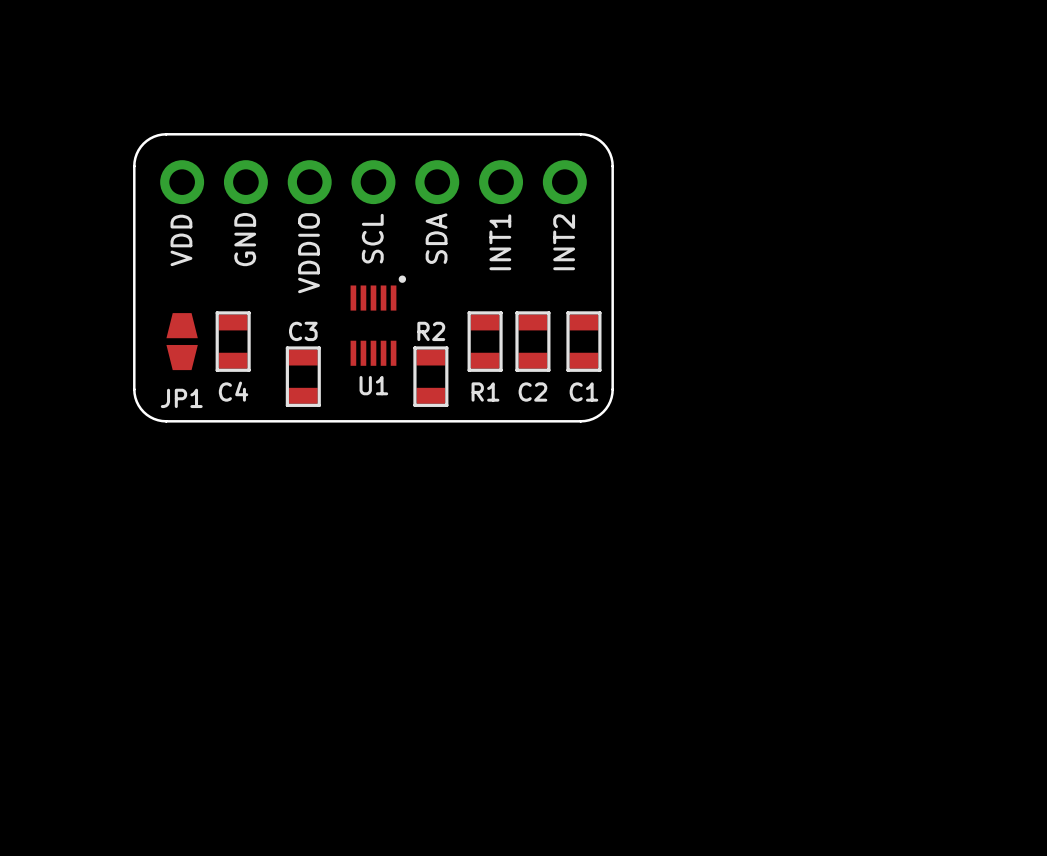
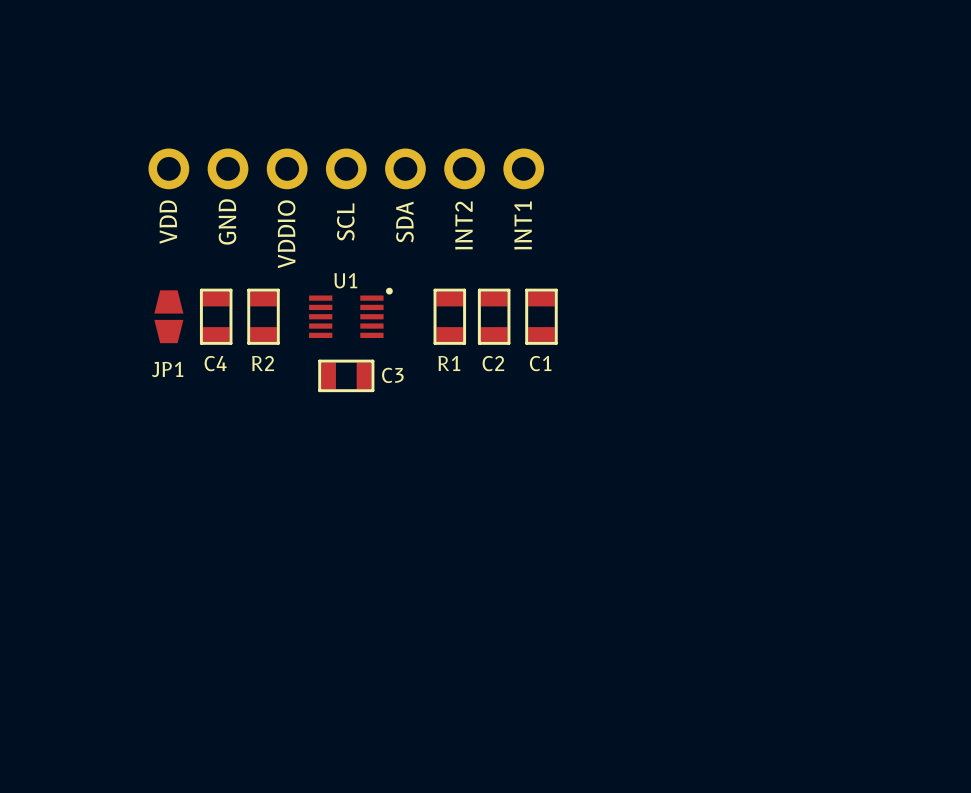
board edge: (612, 166) (612, 393) (606, 408) (592, 418) (580, 421) (166, 421) (153, 418) (143, 411) (136, 401) (134, 389) -> none
board edge: (612, 166) (610, 153) (603, 143) (592, 136) (580, 134) (166, 134) (153, 136) (140, 146) (134, 162) (134, 389) -> none
part value: INT1 (500, 242) -> INT2 (463, 225)
part value: INT2 (564, 242) -> INT1 (523, 225)
U1 footprint: [350, 275, 407, 366] -> [309, 287, 393, 338]
R2 name position: R2 (431, 331) -> R2 (263, 363)
C3 rotation: 0° (303, 376) -> 90° clockwise (346, 375)
C3 position: (303, 376) -> (346, 375)
R2 position: (430, 376) -> (263, 316)
U1 name position: U1 (373, 385) -> U1 (345, 280)

